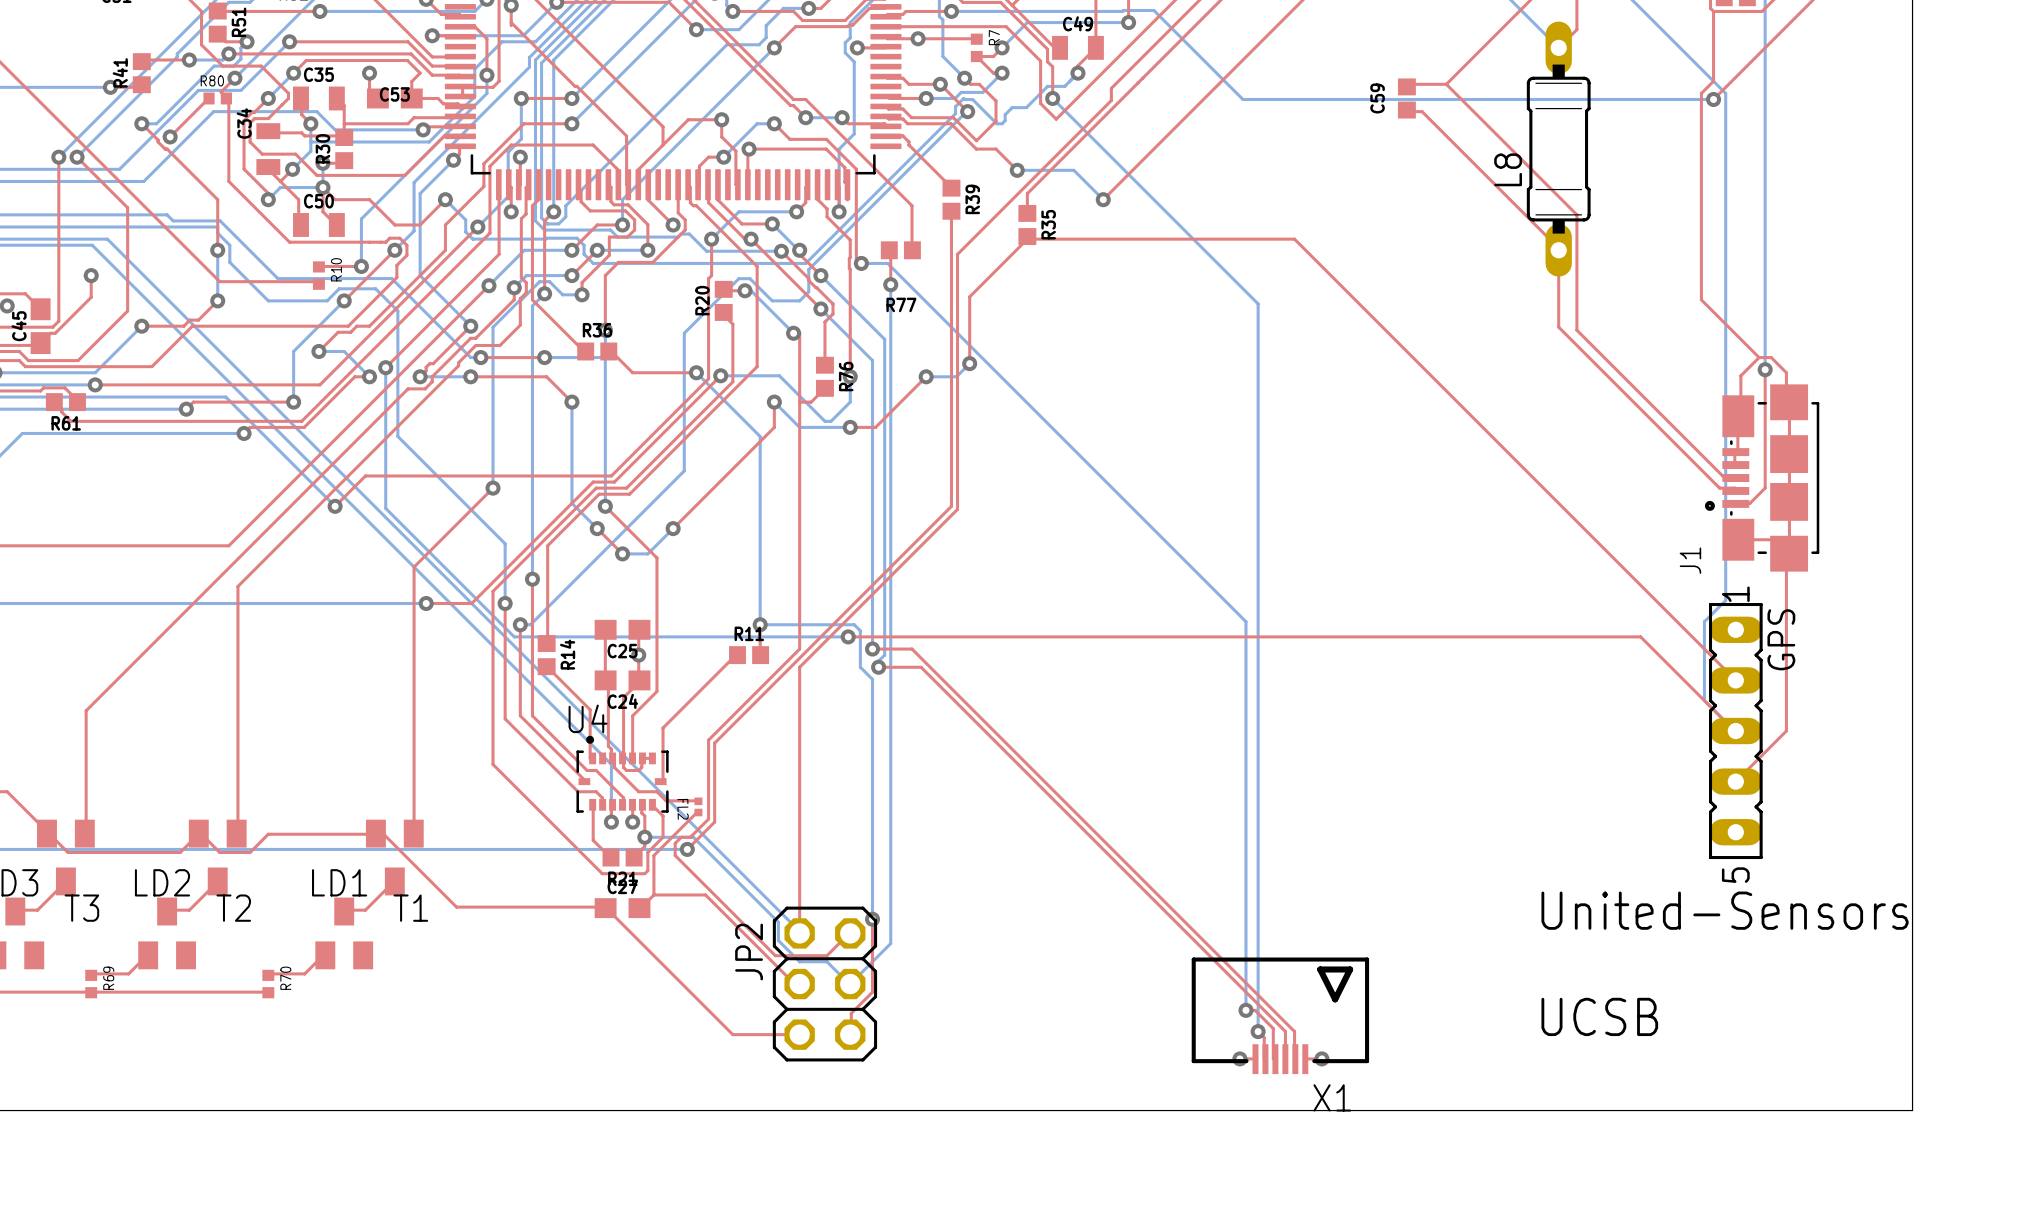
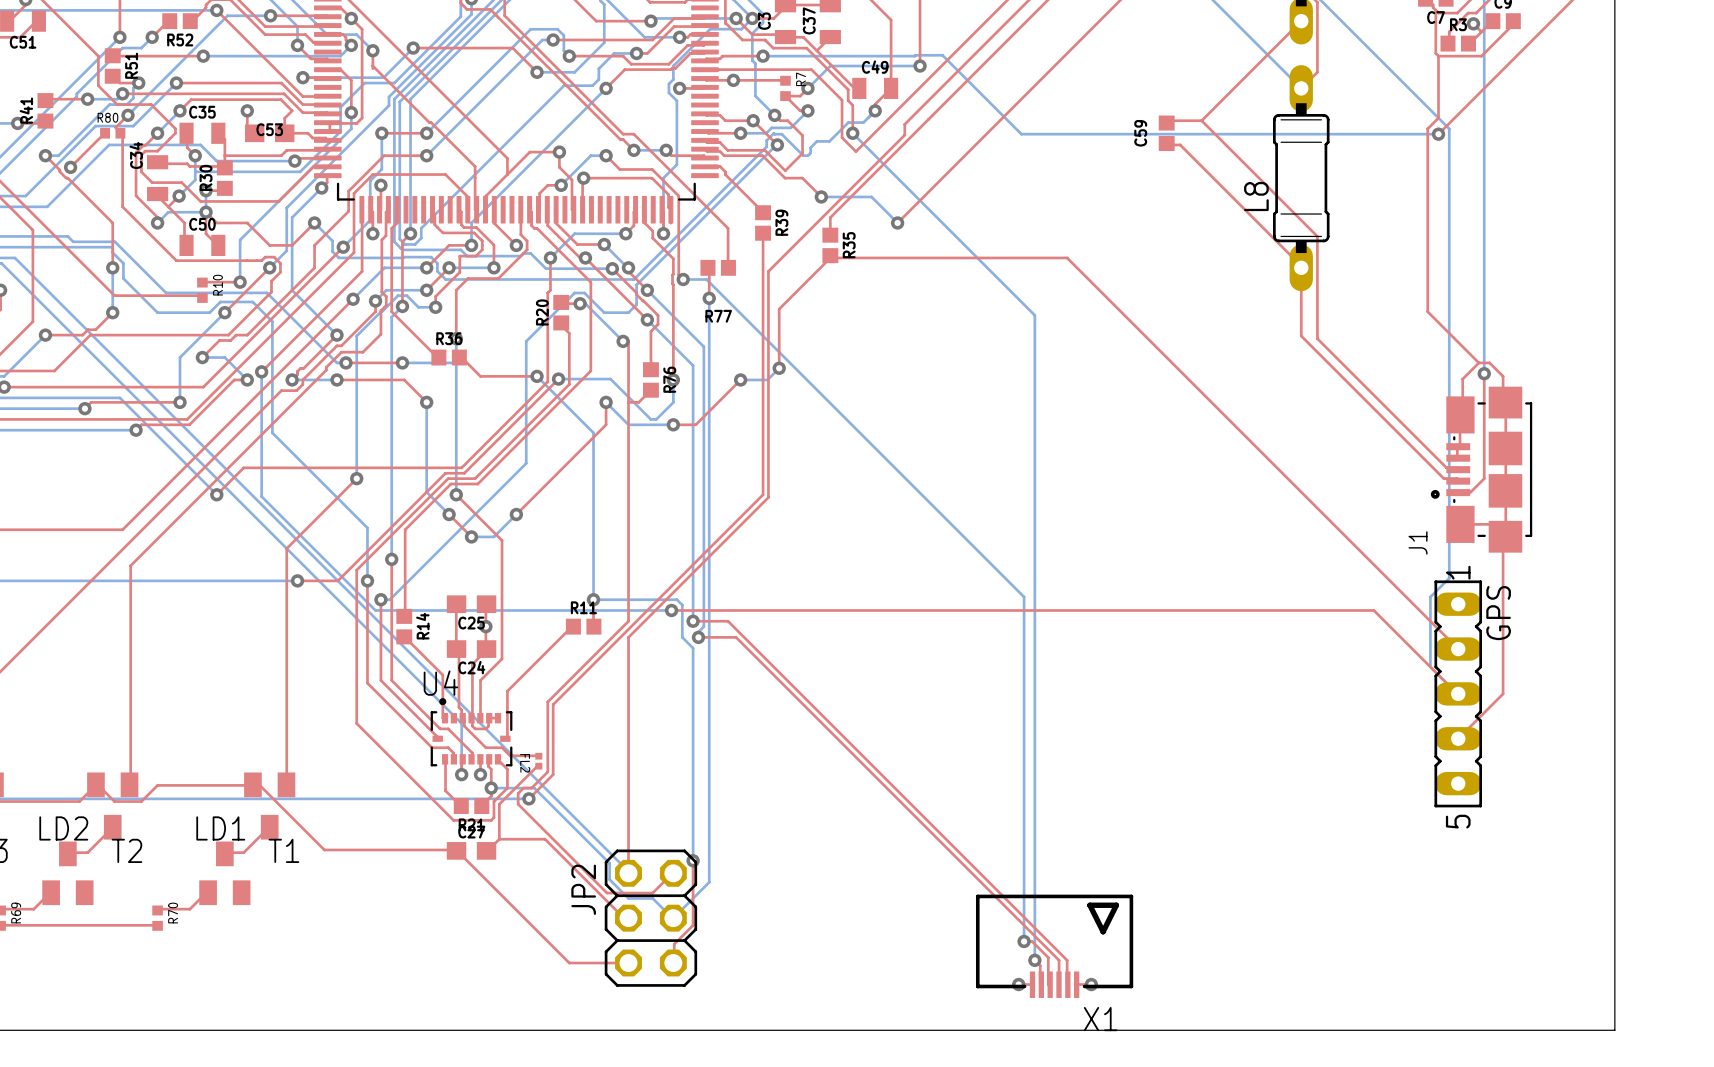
text: United-Sensors (1725, 910) -> none
text: UCSB (1599, 1016) -> none

